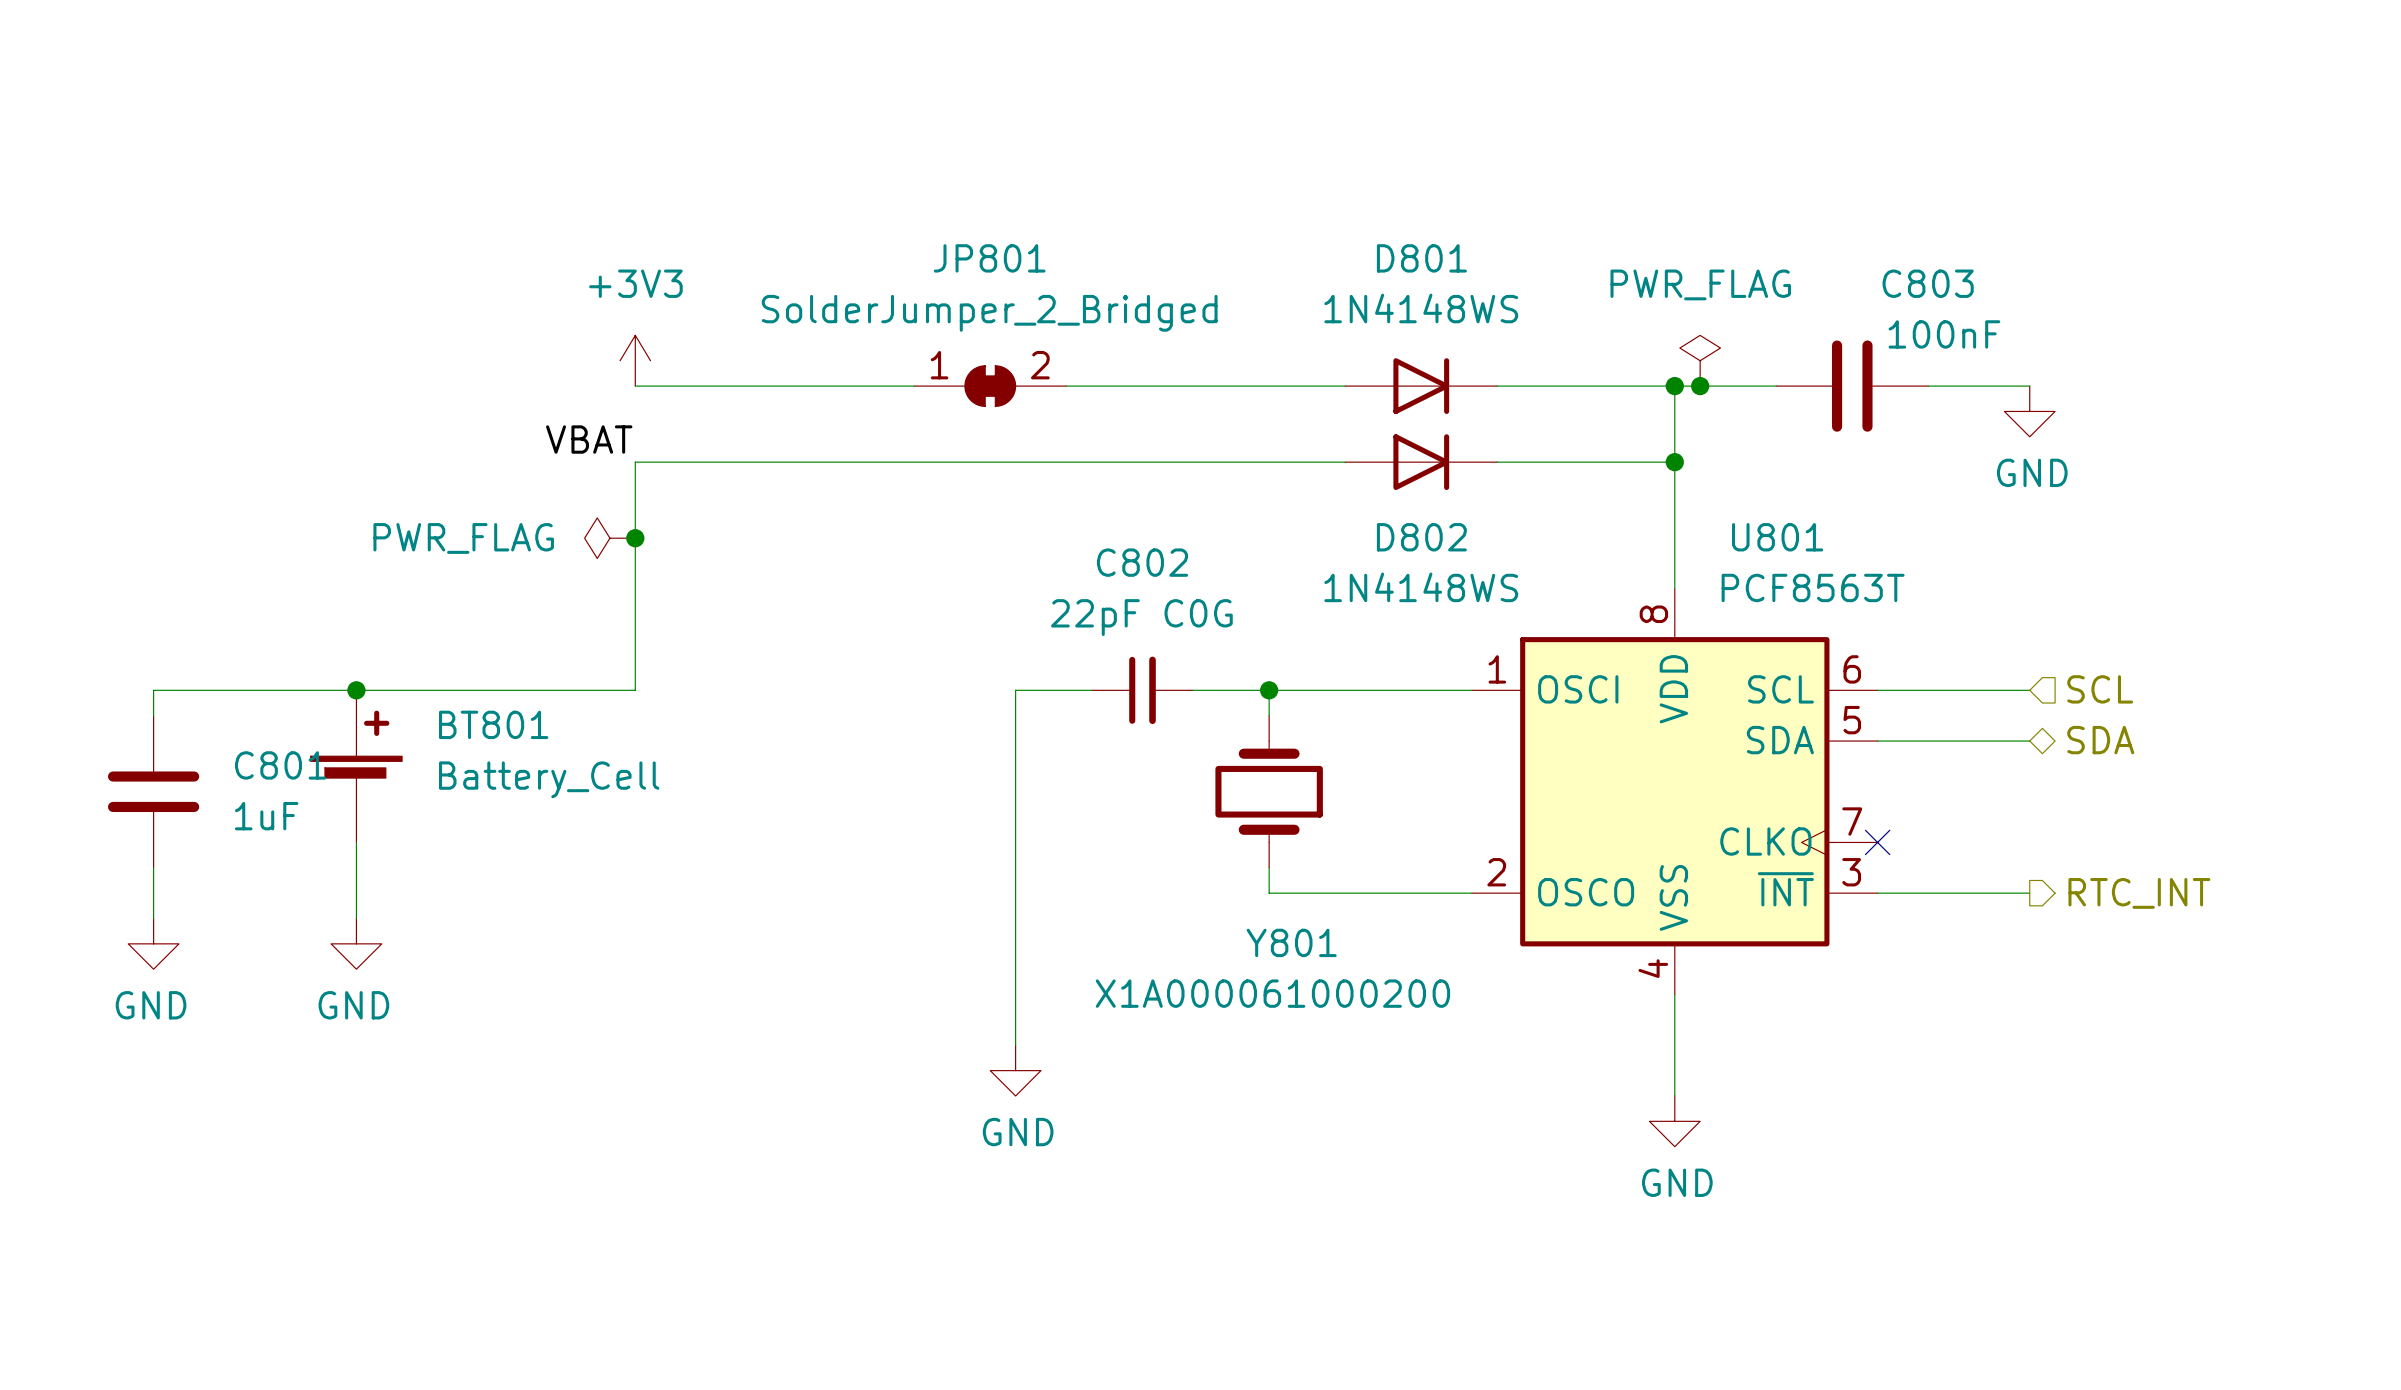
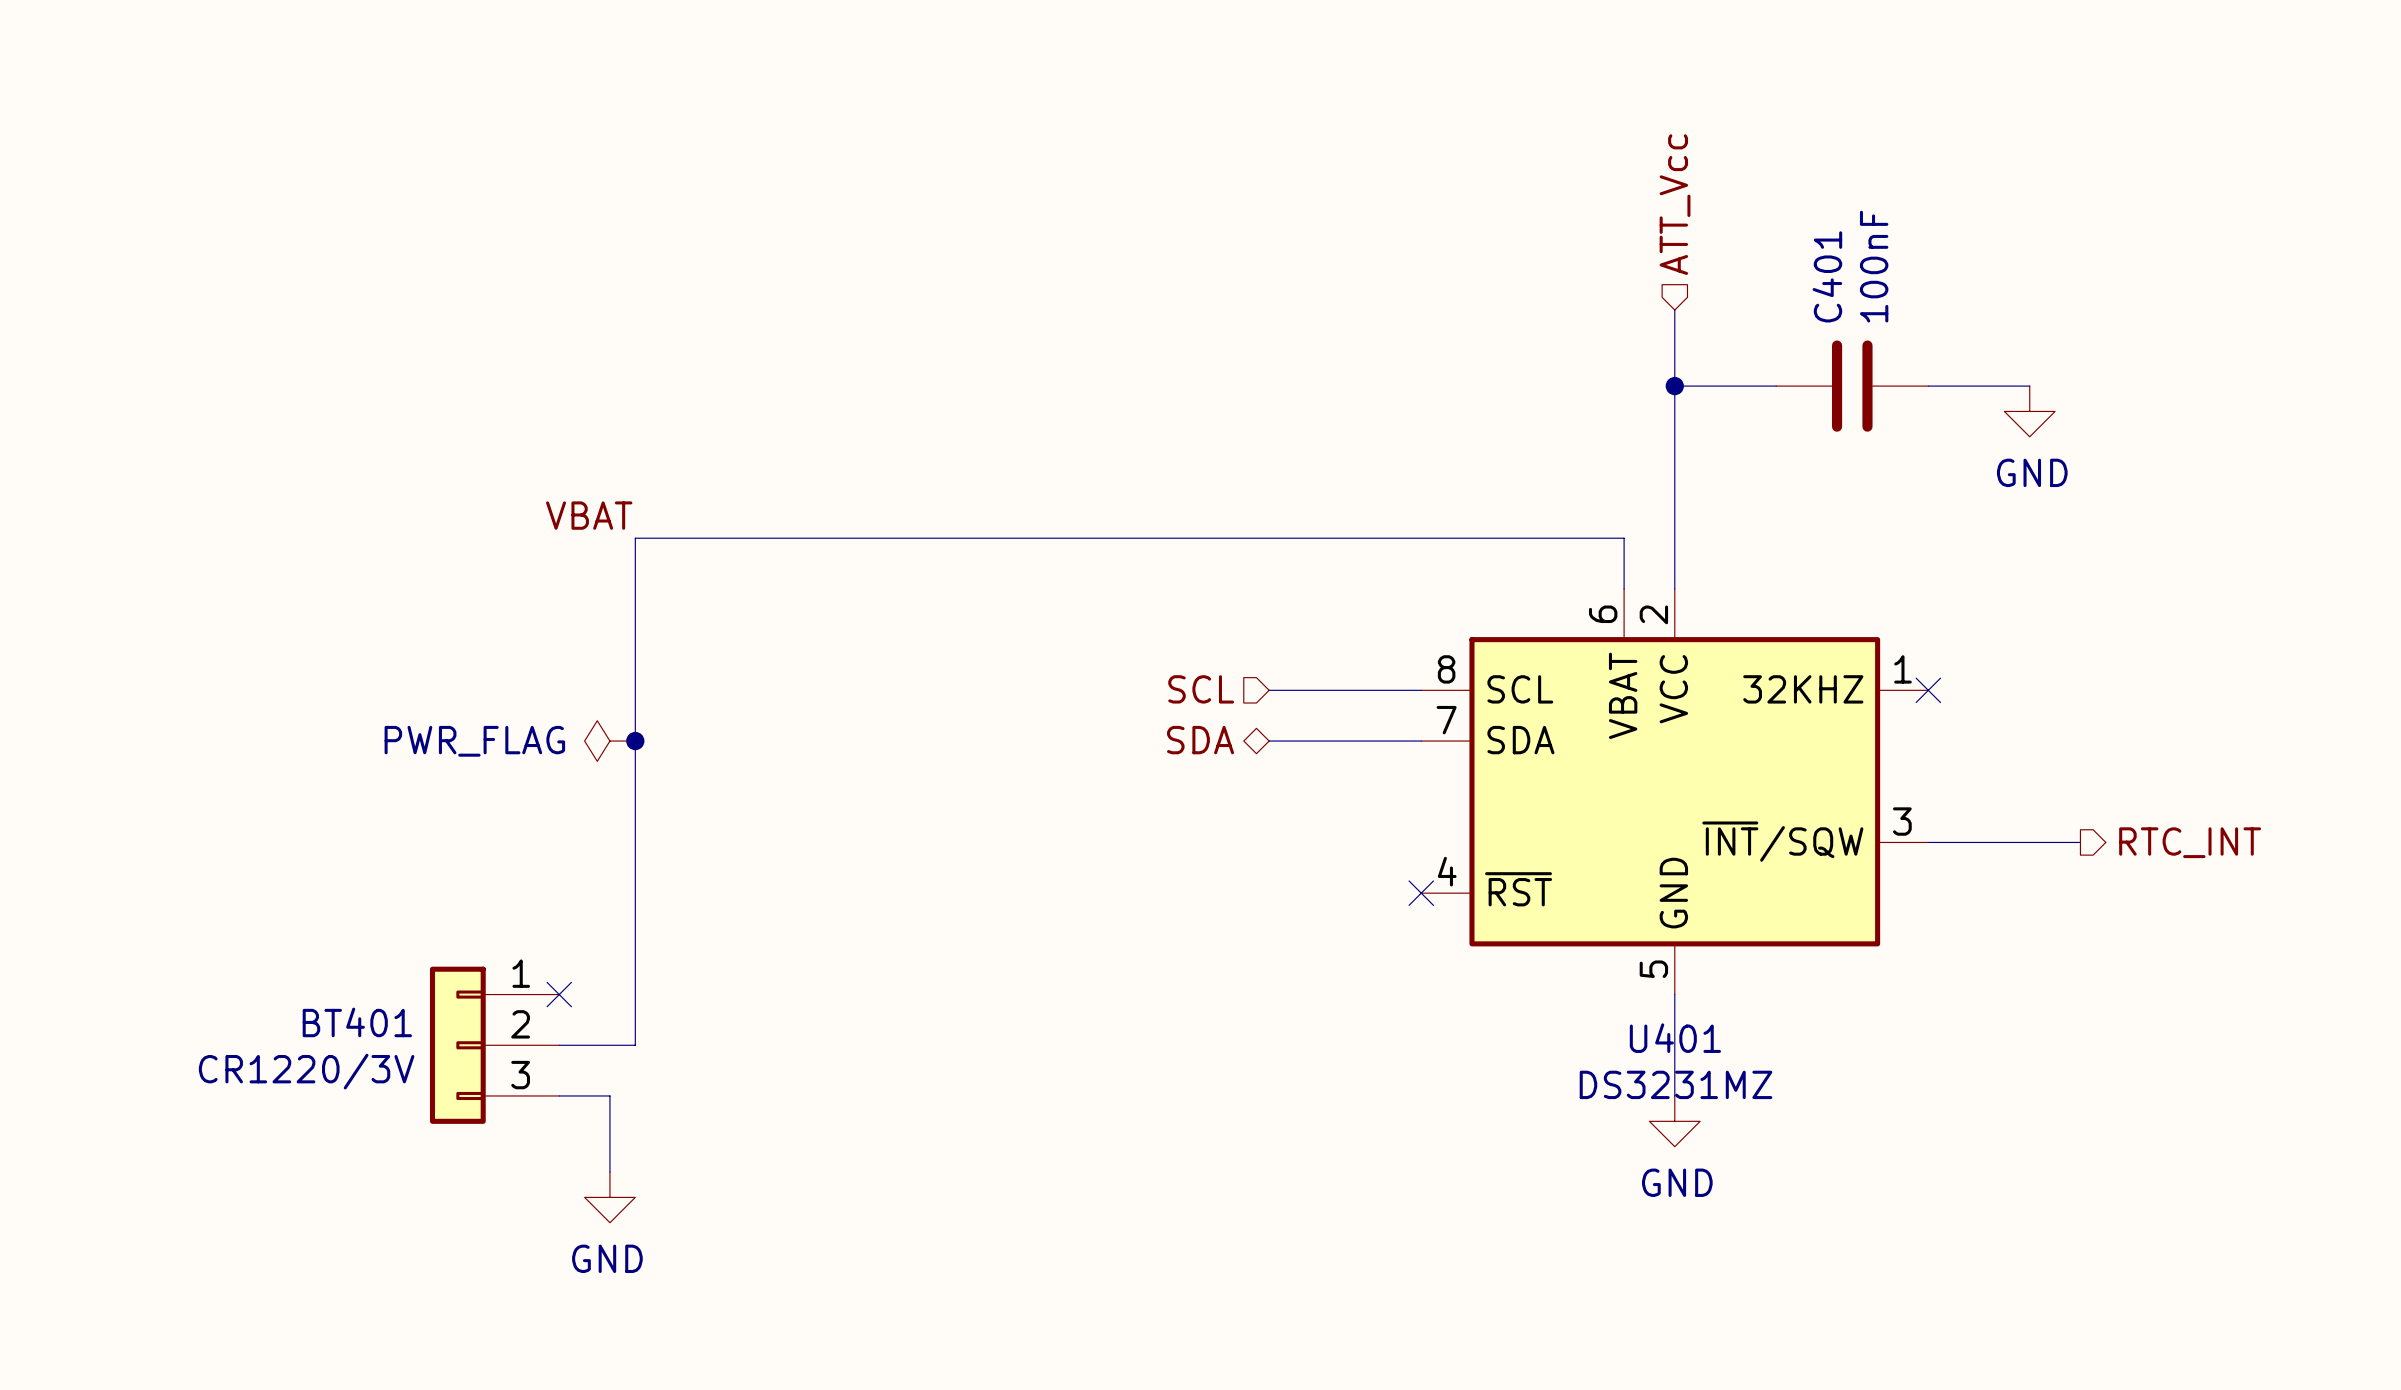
hierarchical label: none -> ATT_Vcc (1675, 204)
C803 name: C803 (1928, 283) -> C401 (1827, 276)
C803 value rotation: 0° (1944, 334) -> 90° counterclockwise (1874, 266)
power symbol: +3V3 (635, 360) -> none
power symbol: PWR_FLAG (1700, 360) -> none
wire: (635, 386) (914, 386) -> none
JP801: SolderJumper_2_Bridged (990, 386) -> none
wire: (1066, 386) (1345, 386) -> none
D801: 1N4148WS (1421, 386) -> none
wire: (1497, 386) (1674, 386) -> (1674, 310) (1674, 386)
junction: (1700, 386) -> none
label position: VBAT (589, 439) -> VBAT (589, 515)
wire: (1345, 462) (635, 462) (635, 538) -> (1624, 588) (1624, 538) (635, 538)
D802: 1N4148WS (1421, 462) -> none
wire: (1497, 462) (1674, 462) -> none
junction: (1674, 462) -> none
power symbol text position: PWR_FLAG (463, 538) -> PWR_FLAG (474, 741)
power symbol position: PWR_FLAG (609, 538) -> PWR_FLAG (609, 741)
junction: (635, 538) -> none
hierarchical label: none -> SCL (1201, 689)
hierarchical label: SCL (2100, 689) -> none
junction: (356, 690) -> none
wire: (635, 690) (153, 690) (153, 715) -> (635, 690) (635, 1045) (559, 1045)
wire: (1091, 690) (1015, 690) (1015, 1045) -> none
C802: 22pF C0G (1142, 690) -> none
wire: (1193, 690) (1269, 690) (1269, 715) -> none
junction: (1269, 690) -> none
wire: (1877, 690) (2029, 690) -> none
no-connect mark: none -> (1928, 690)
hierarchical label: none -> SDA (1200, 740)
hierarchical label: SDA (2100, 740) -> none
junction: none -> (635, 741)
wire: none -> (1269, 741) (1421, 741)
wire: (1877, 741) (2029, 741) -> none
BT801: Battery_Cell (356, 766) -> none
C801: 1uF (153, 791) -> none
Y801: X1A000061000200 (1269, 791) -> none
U801: PCF8563T (1674, 791) -> none
U401: none -> DS3231MZ (1674, 791)
wire: (356, 842) (356, 918) -> none
no-connect mark: (1877, 842) -> none
wire: (153, 867) (153, 918) -> none
wire: (1269, 867) (1269, 893) (1471, 893) -> none
no-connect mark: none -> (1421, 893)
wire: (1877, 893) (2029, 893) -> (1928, 842) (2080, 842)
hierarchical label position: RTC_INT (2139, 893) -> RTC_INT (2190, 842)
power symbol: GND (153, 943) -> none
power symbol: GND (356, 943) -> none
no-connect mark: none -> (559, 994)
BT401: none -> CR1220/3V (494, 1045)
power symbol: GND (1015, 1070) -> none
wire: none -> (559, 1095) (609, 1095) (609, 1172)
power symbol: none -> GND (609, 1197)

